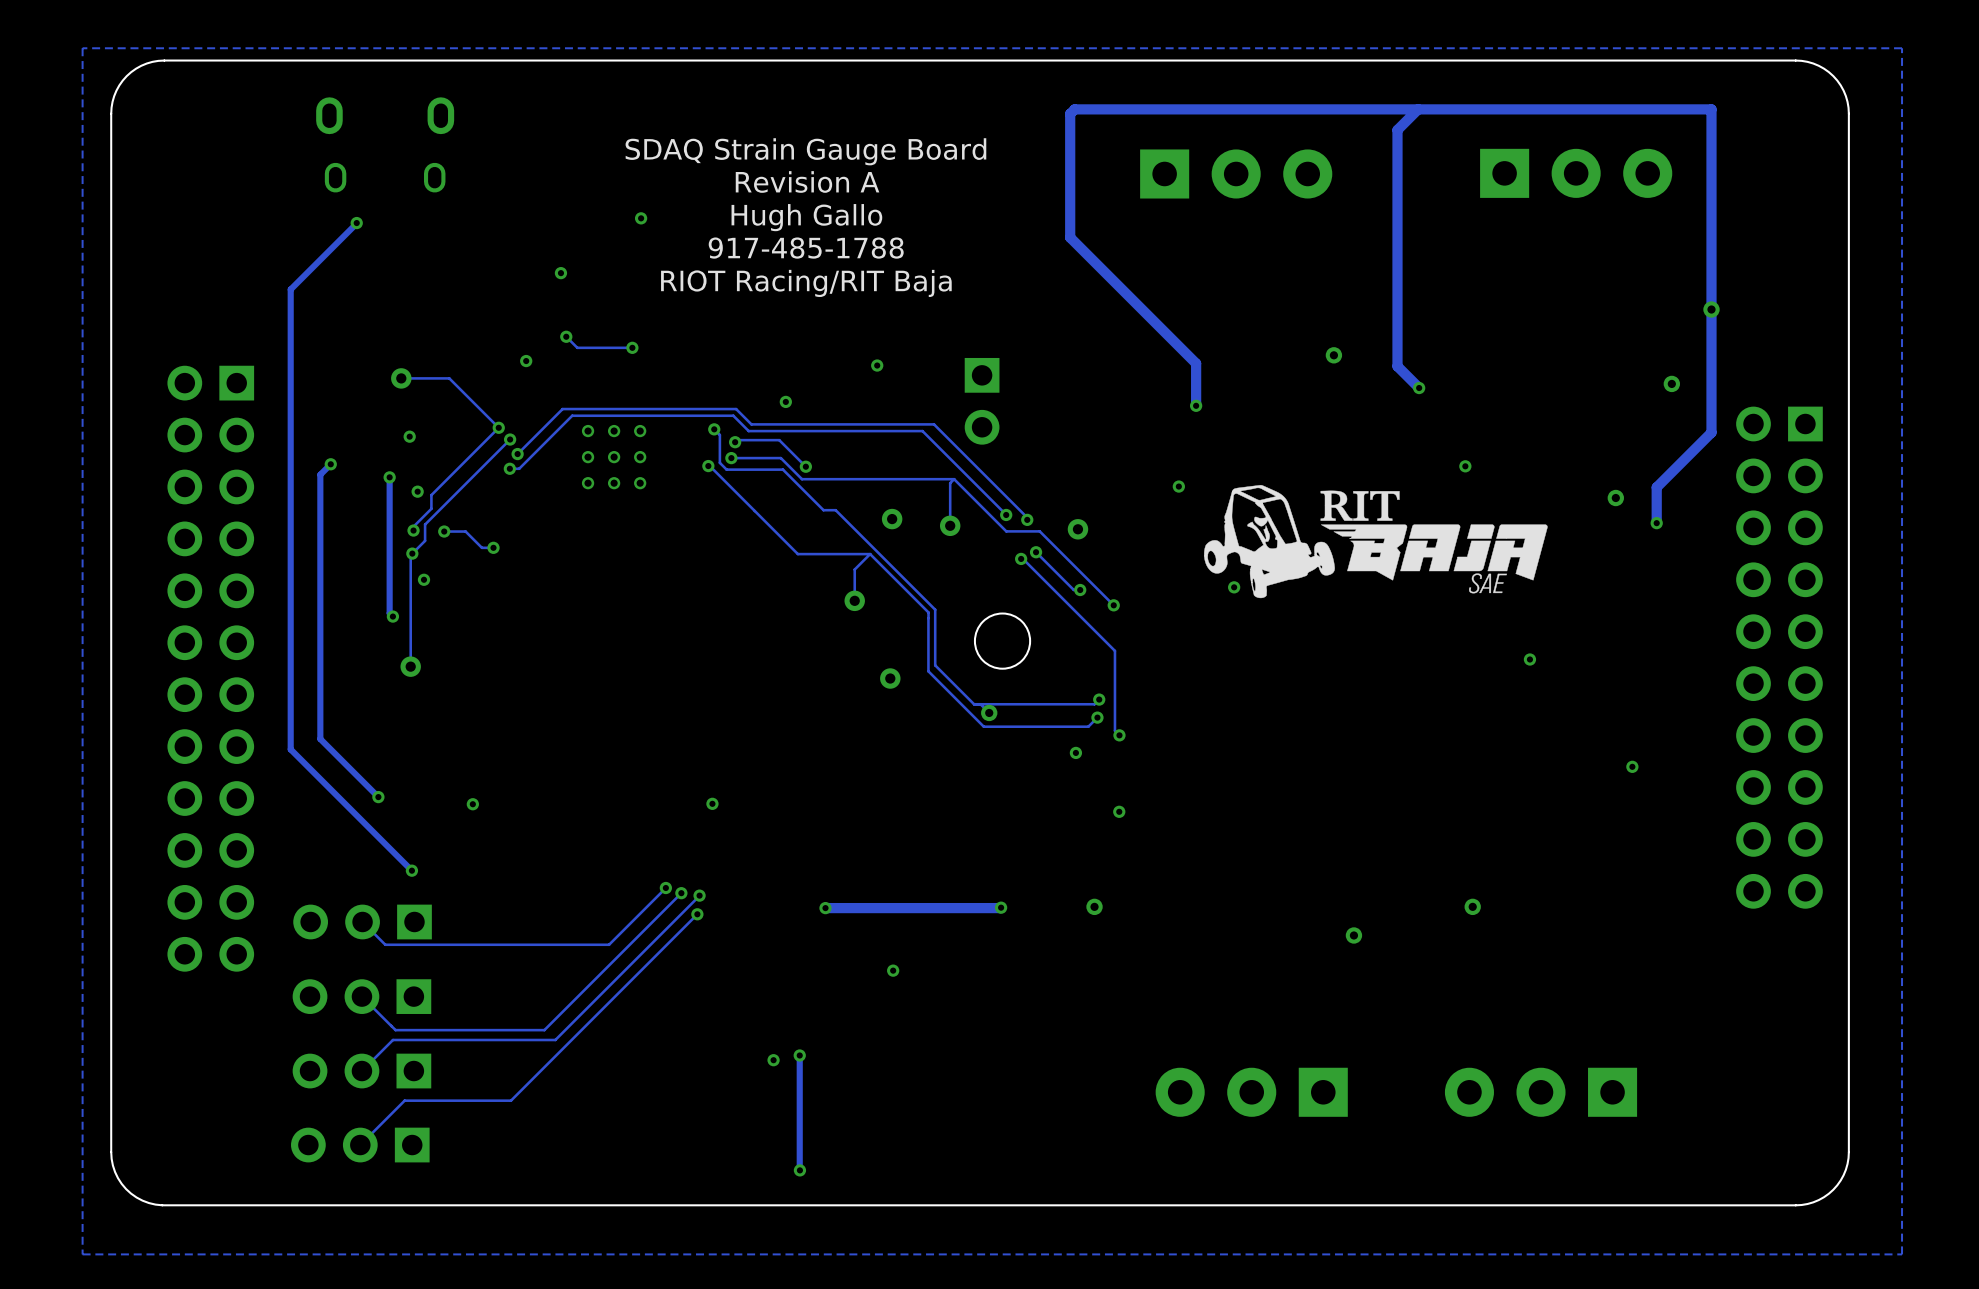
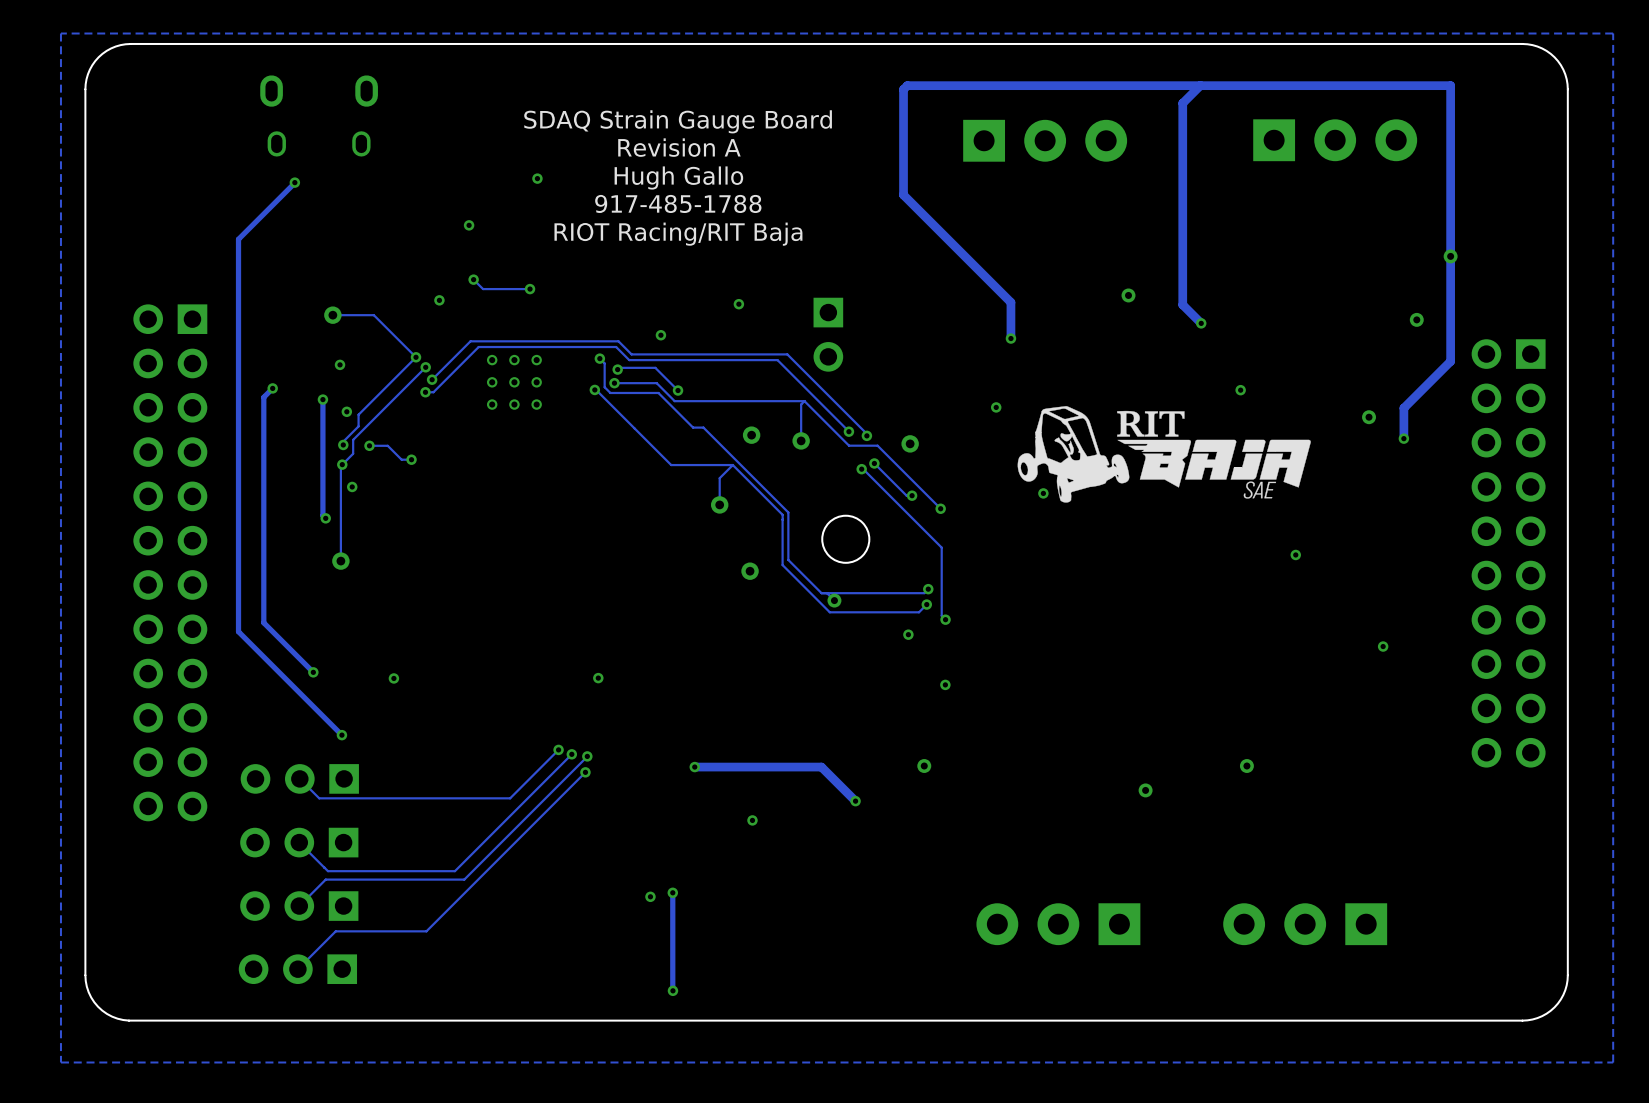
track: (1001, 907) (974, 908) -> (855, 801) (821, 767)
via position: (1001, 907) -> (855, 801)

